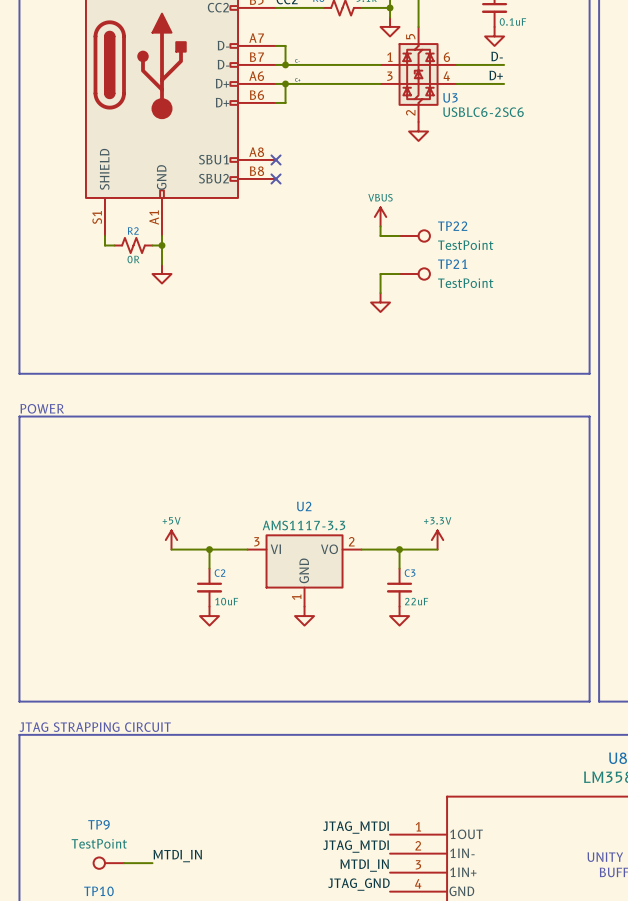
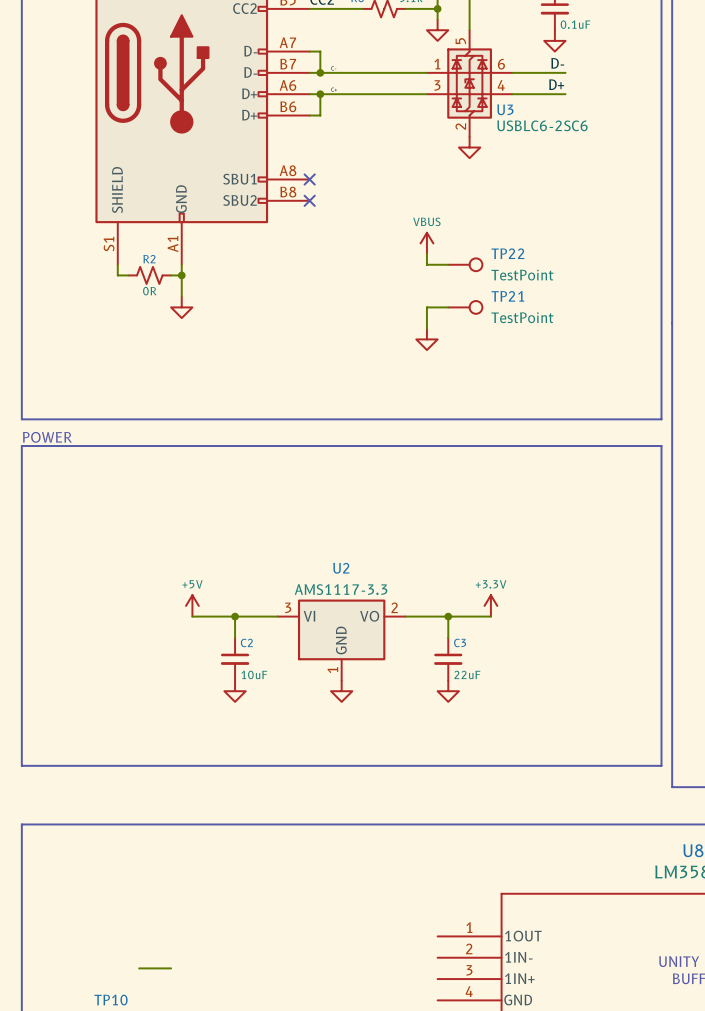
text position: POWER (42, 408) -> POWER (47, 437)
line: (19, 416) (589, 416) -> (21, 467) (21, 446) (661, 446) (661, 467)
line: (19, 682) (19, 701) (589, 701) (589, 682) -> (21, 765) (661, 765)
text: JTAG STRAPPING CIRCUIT (95, 727) -> none
label: JTAG_MTDI (355, 827) -> none
label: JTAG_MTDI (355, 846) -> none
label: MTDI_IN (177, 856) -> none
TP9: TestPoint (108, 863) -> none
label: MTDI_IN (364, 865) -> none
label: JTAG_GND (358, 884) -> none

